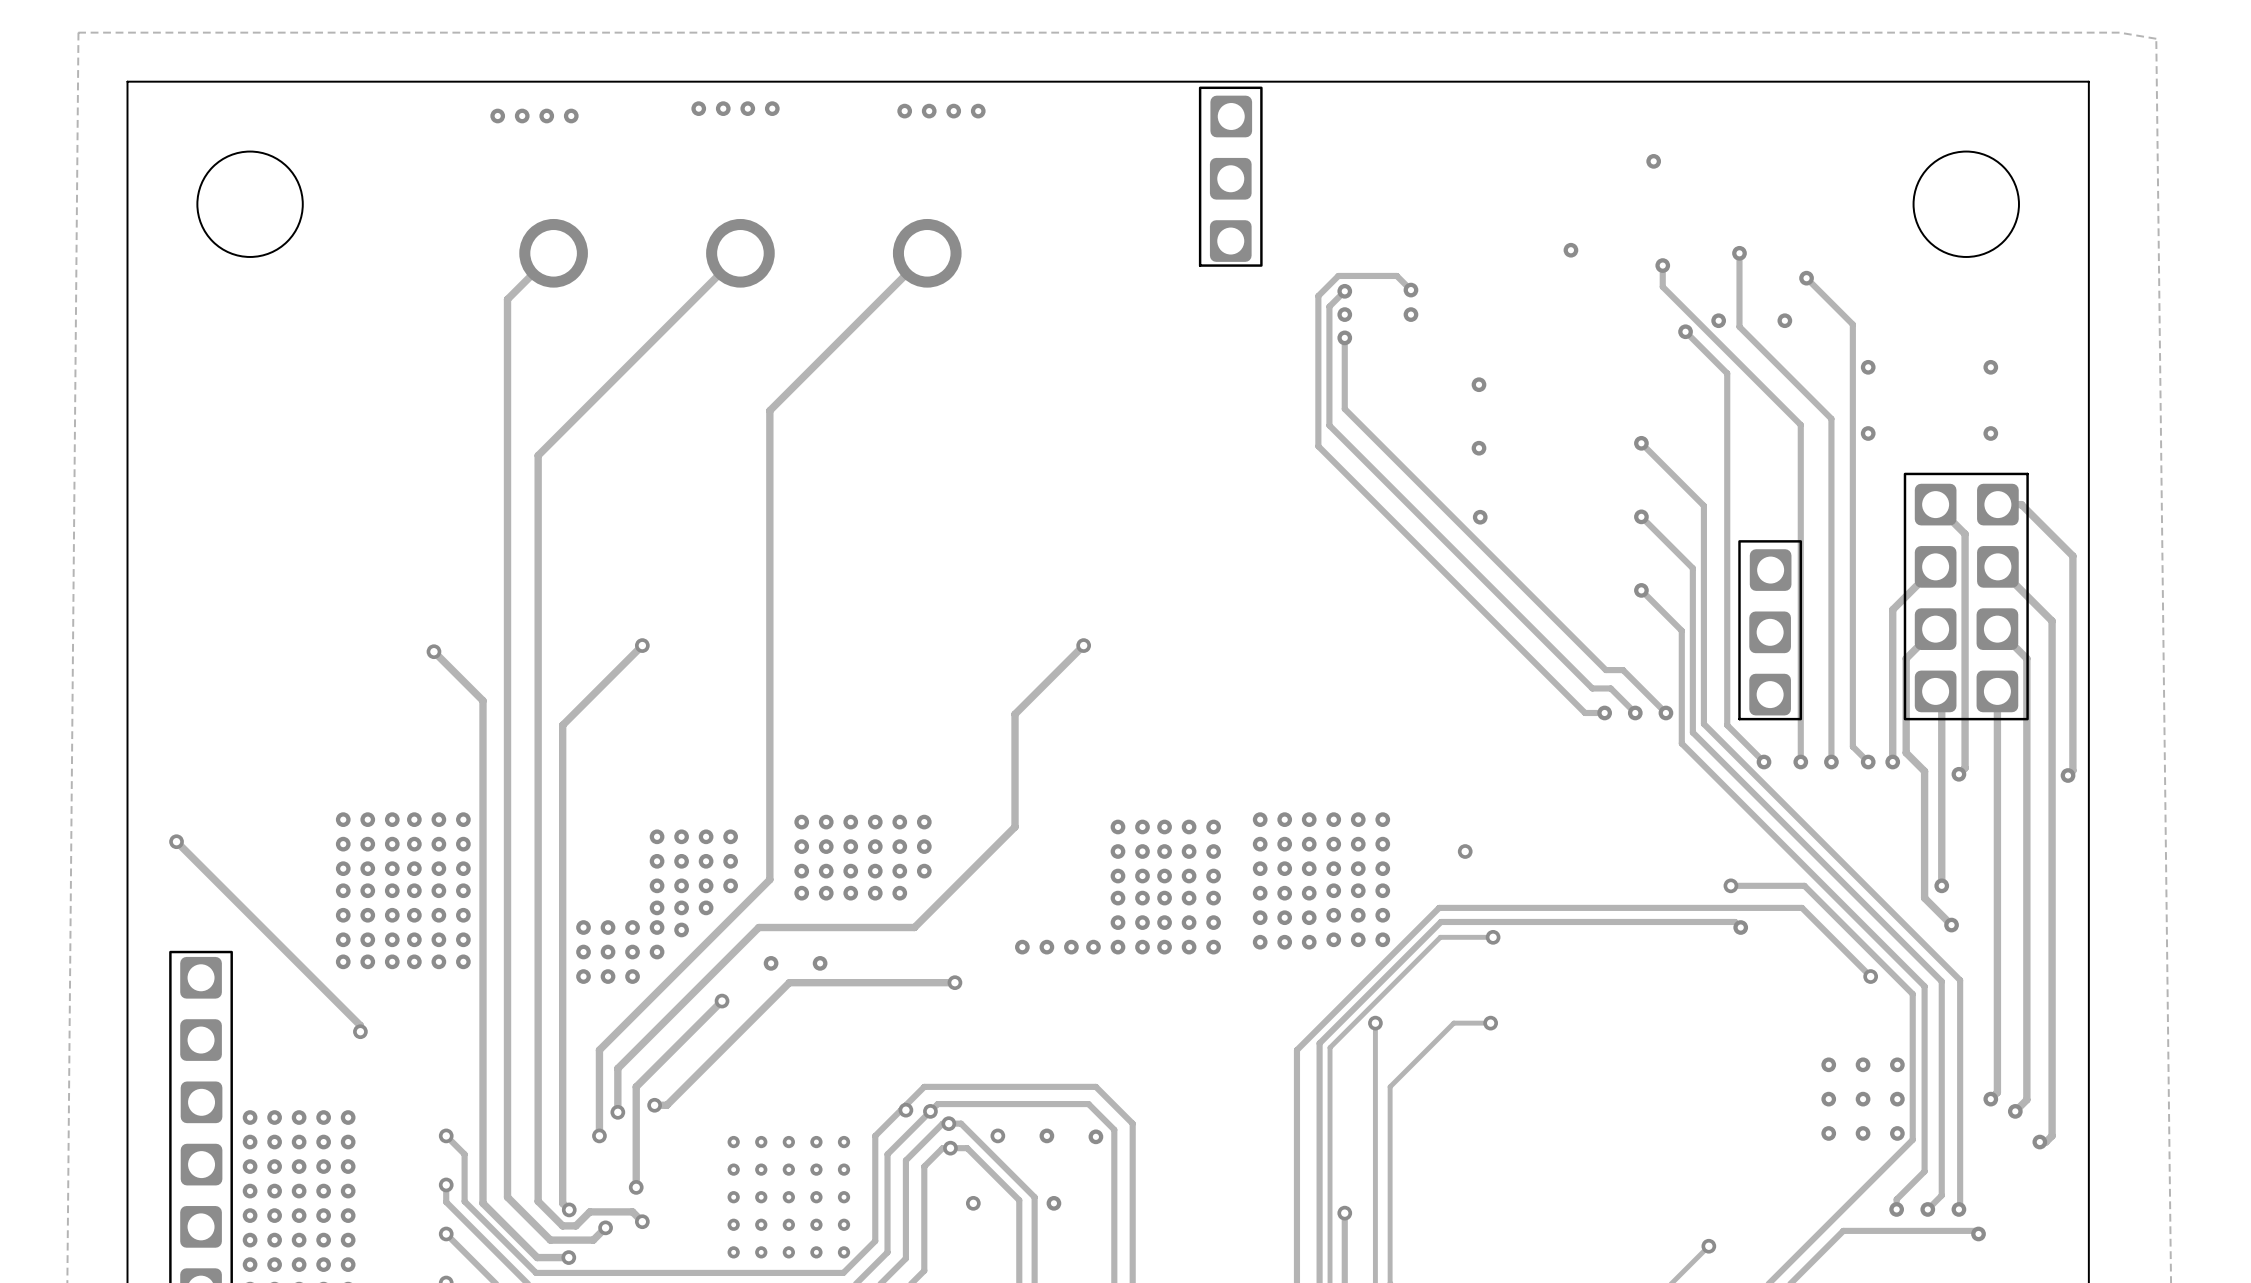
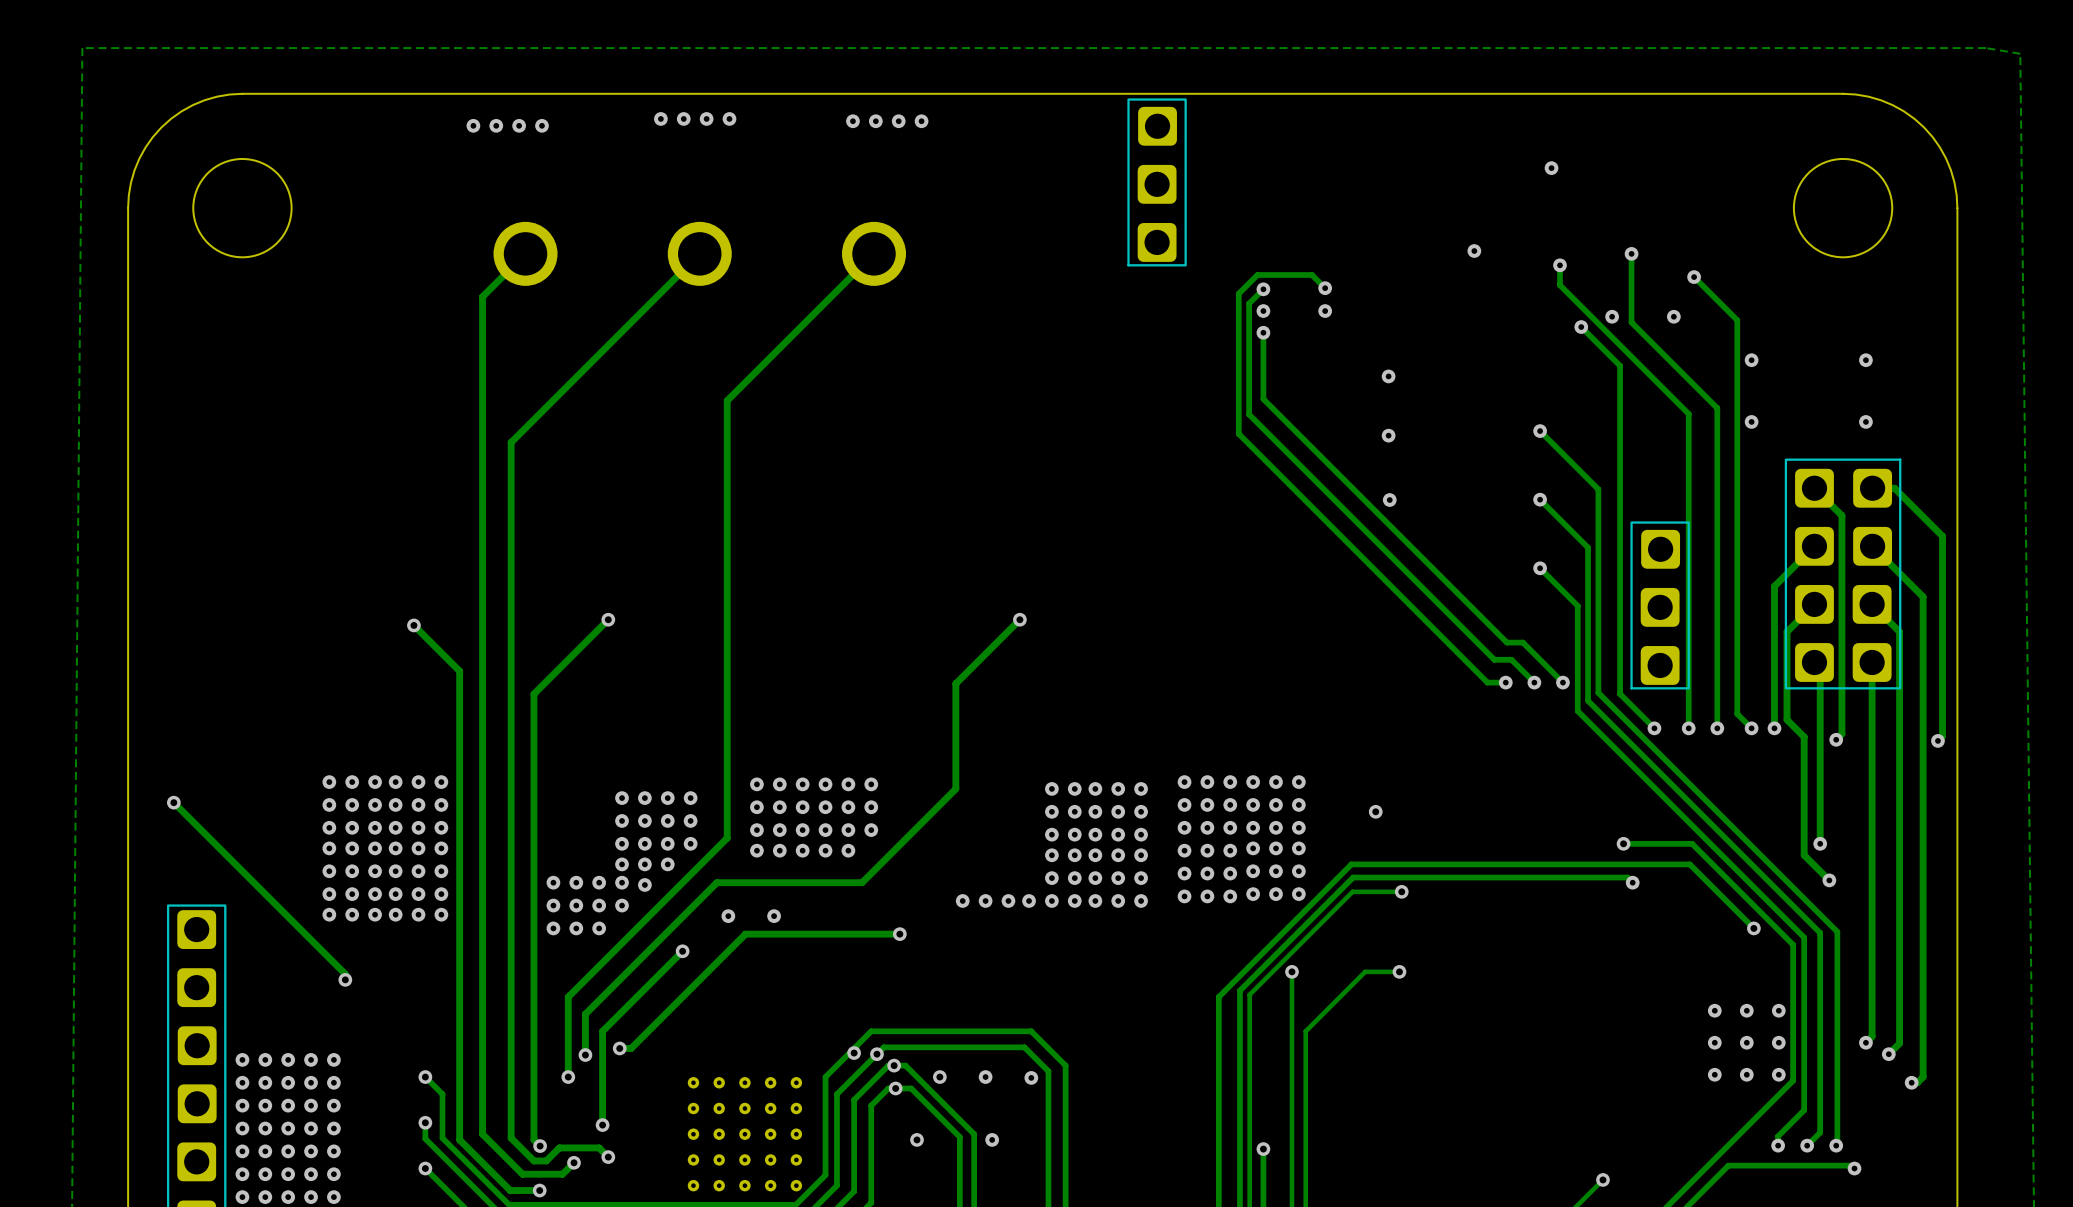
board edge: (250, 81) (127, 81) (127, 204) -> (242, 93) (204, 100) (181, 111) (161, 127) (145, 147) (134, 170) (128, 208)
board edge: (1966, 81) (2088, 81) (2088, 204) -> (1843, 93) (1868, 96) (1892, 105) (1923, 127) (1939, 147) (1950, 170) (1957, 208)

